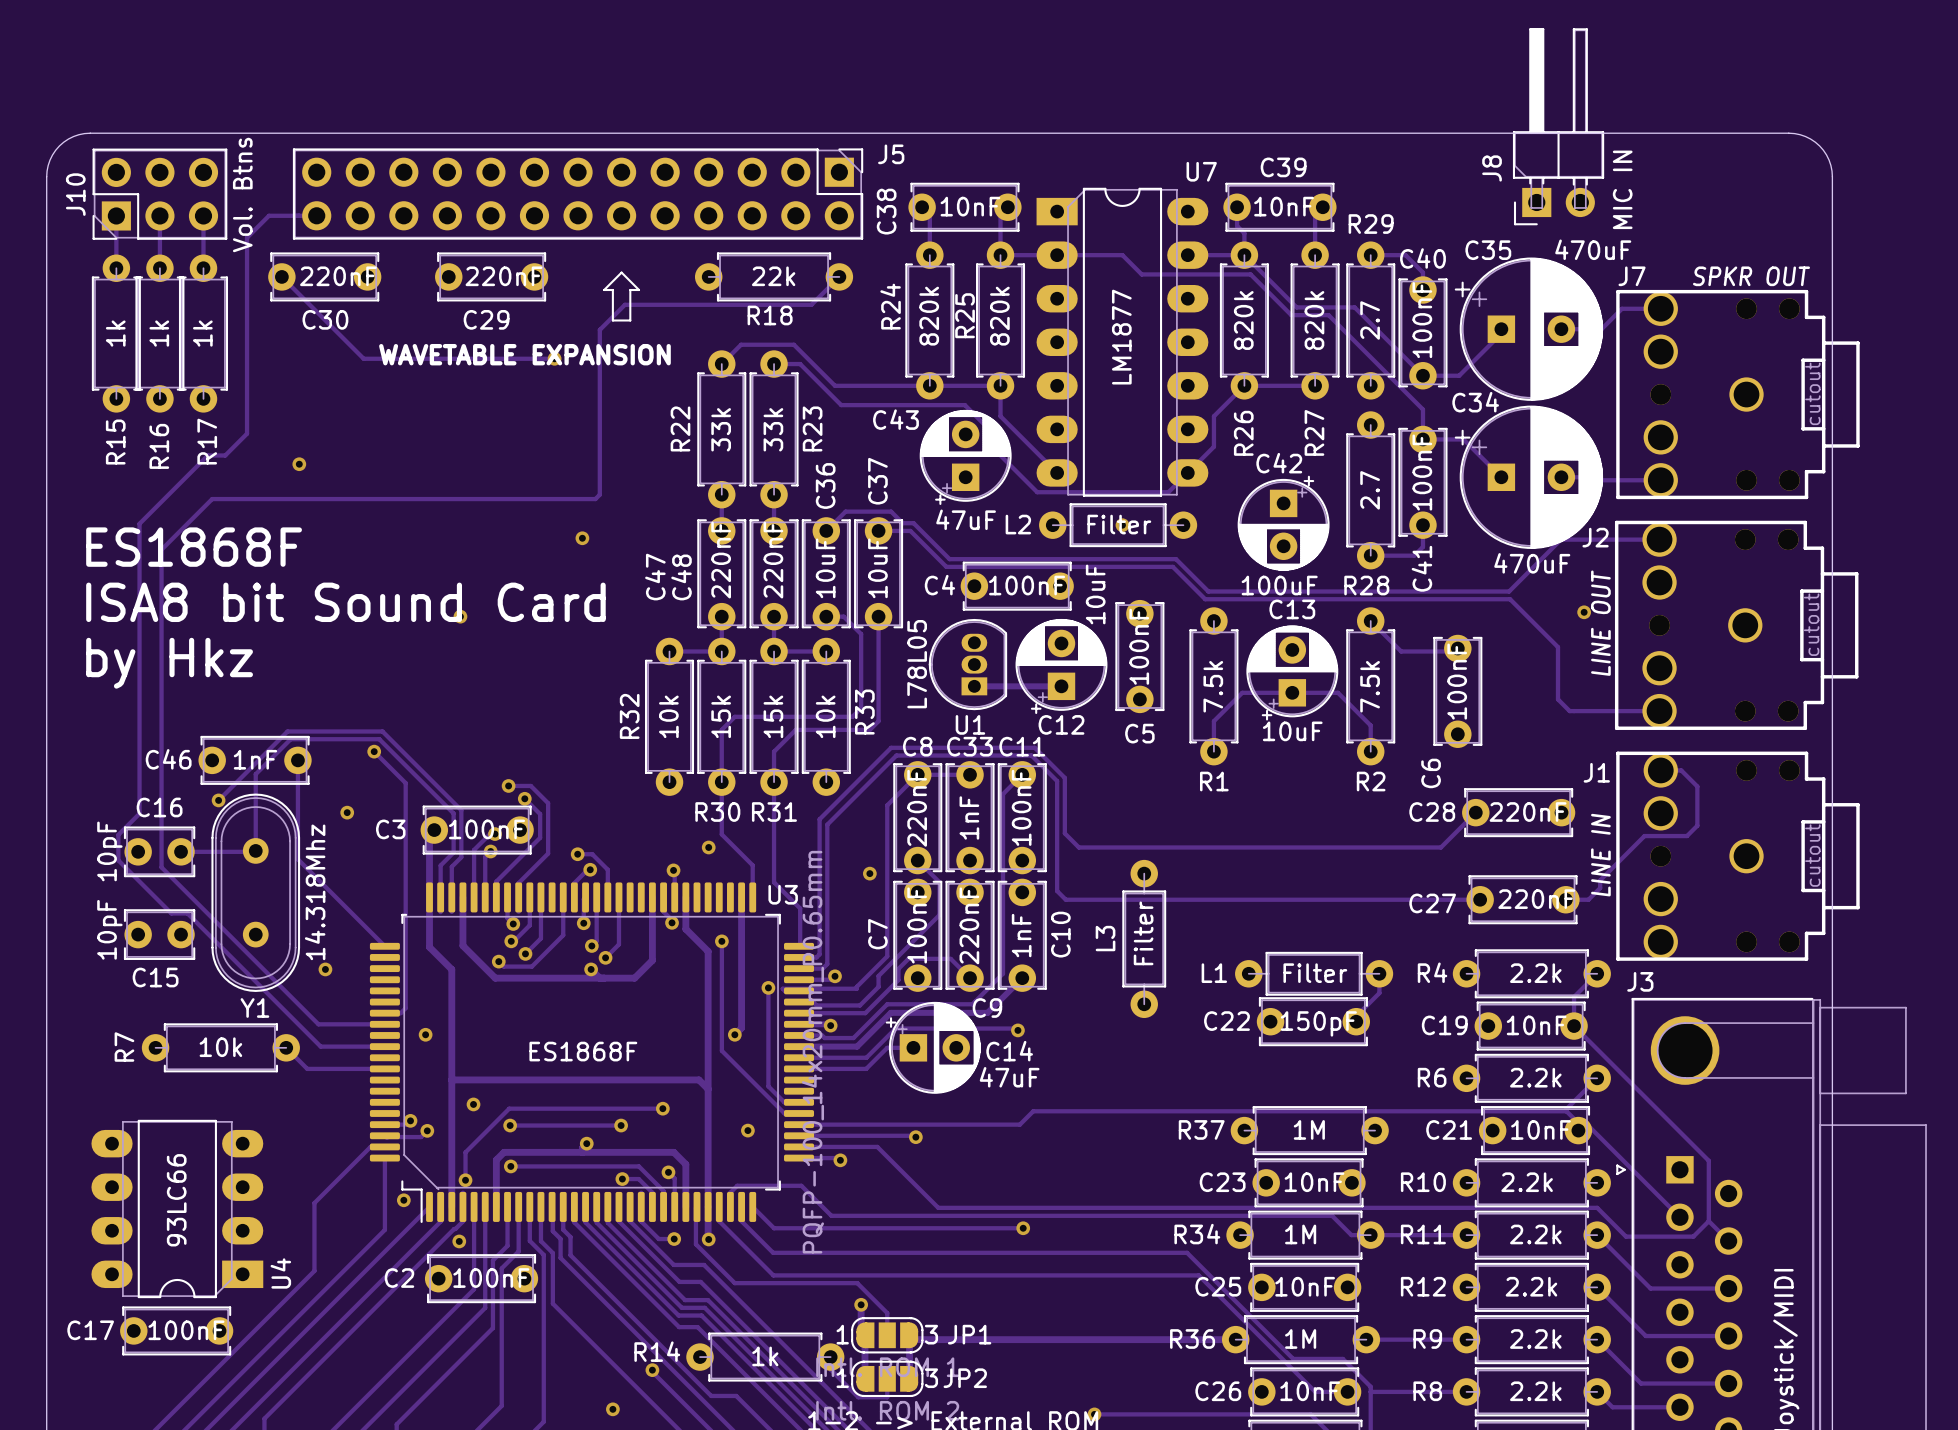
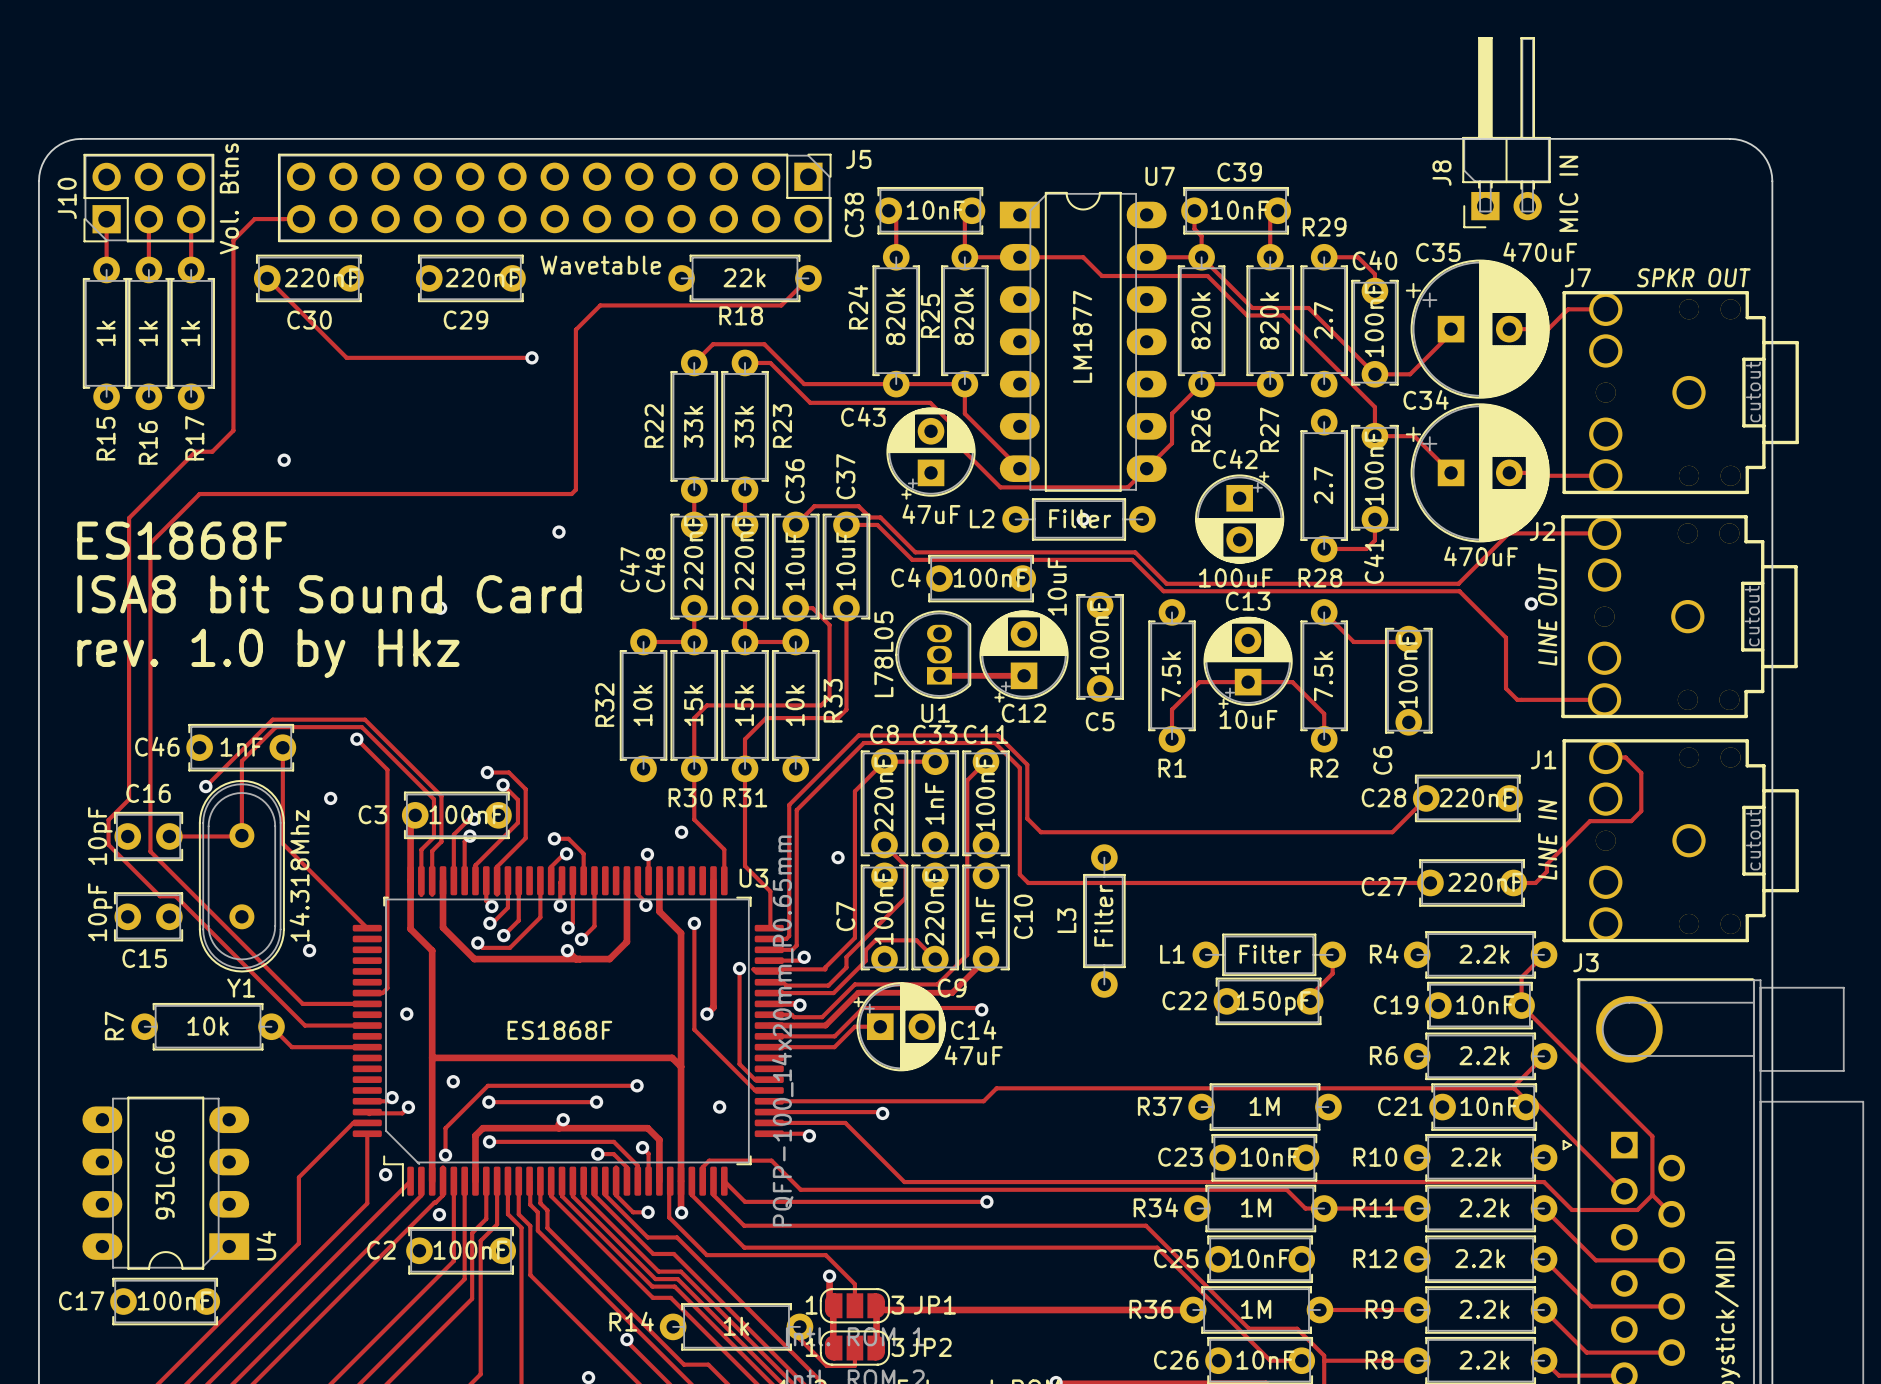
line: (621, 272) (604, 290) (612, 290) (612, 320) (630, 320) (630, 290) (639, 290) (621, 272) -> none
J5 value: WAVETABLE EXPANSION (524, 354) -> Wavetable (600, 265)
text: by Hkz (169, 663) -> rev. 1.0 by Hkz (268, 653)

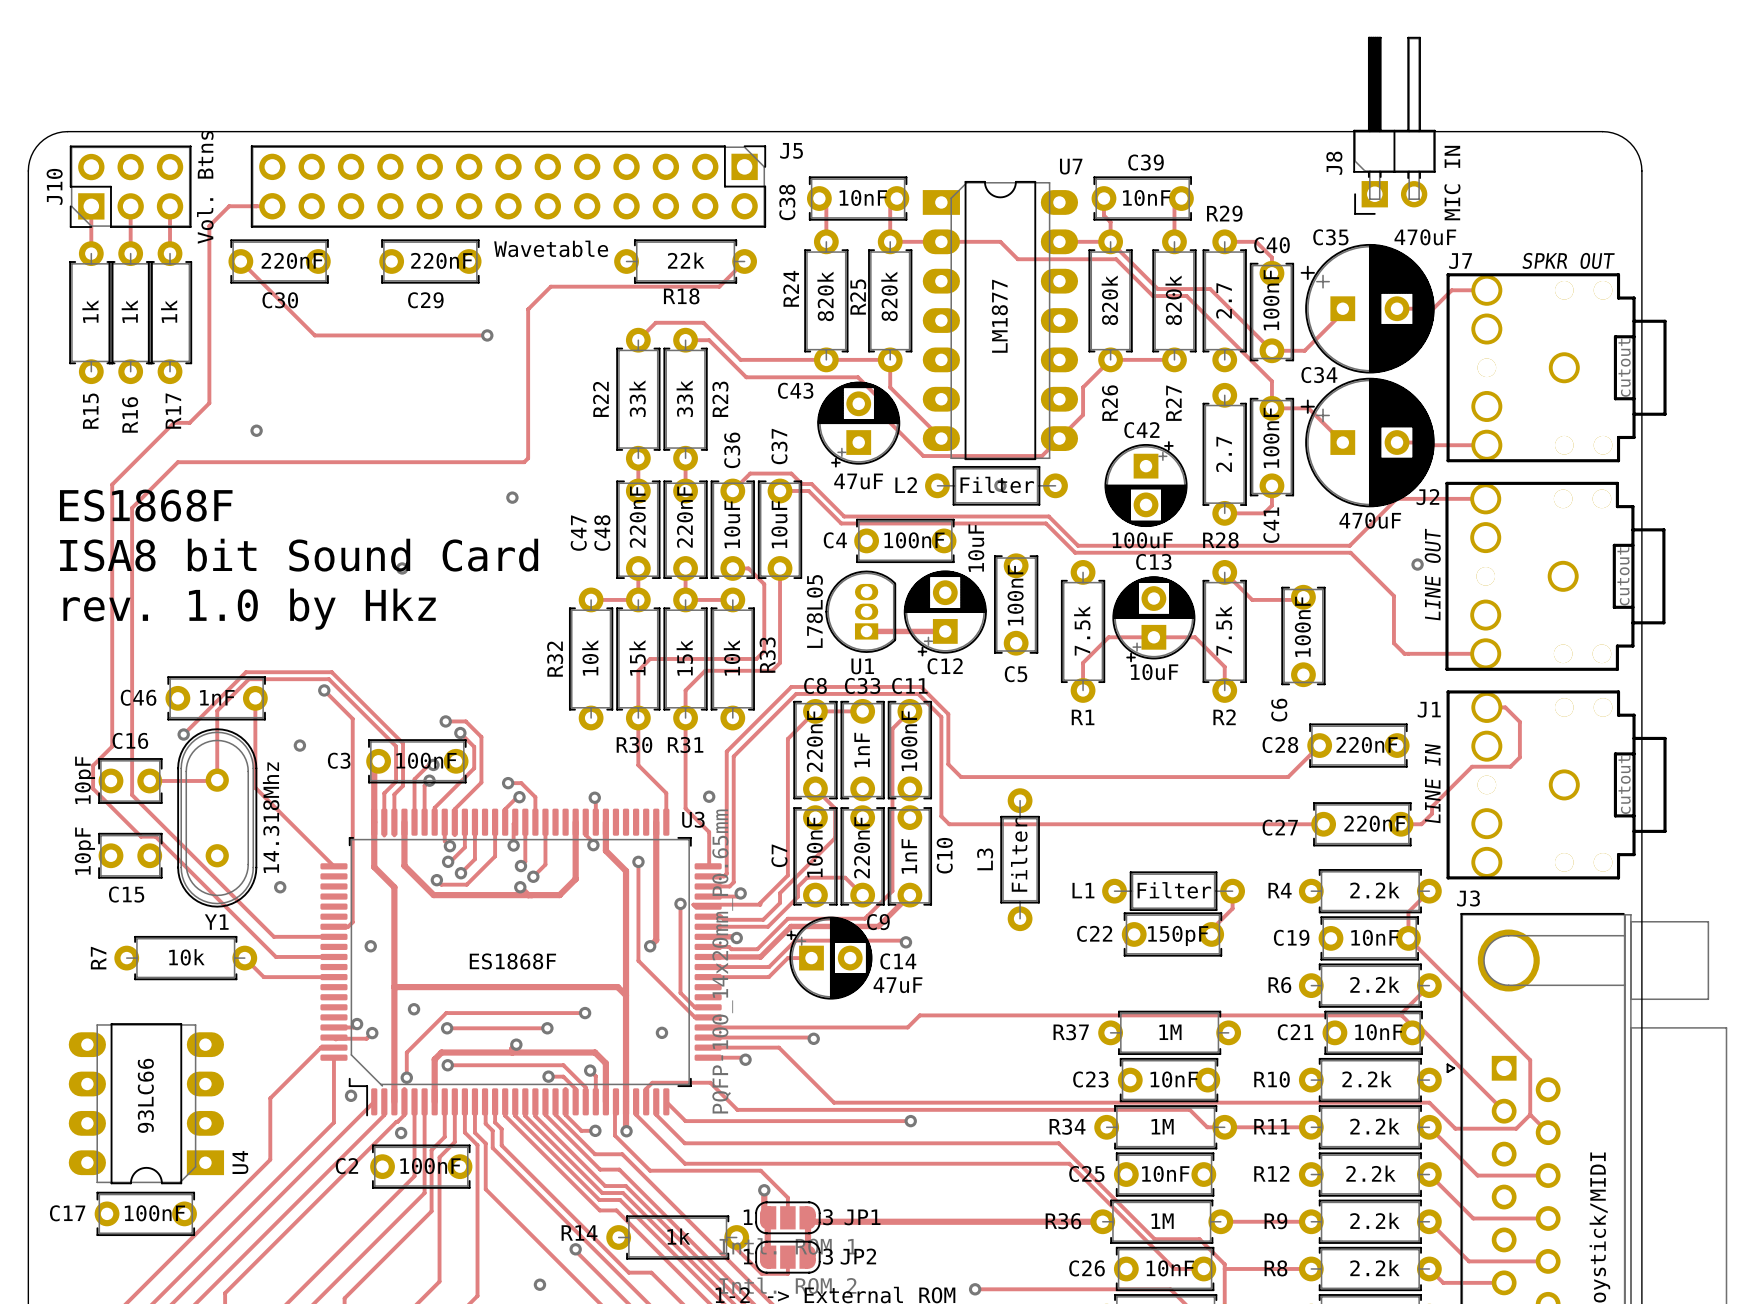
via: (681, 832) -> none
via: none -> (709, 796)
via: (838, 857) -> none

